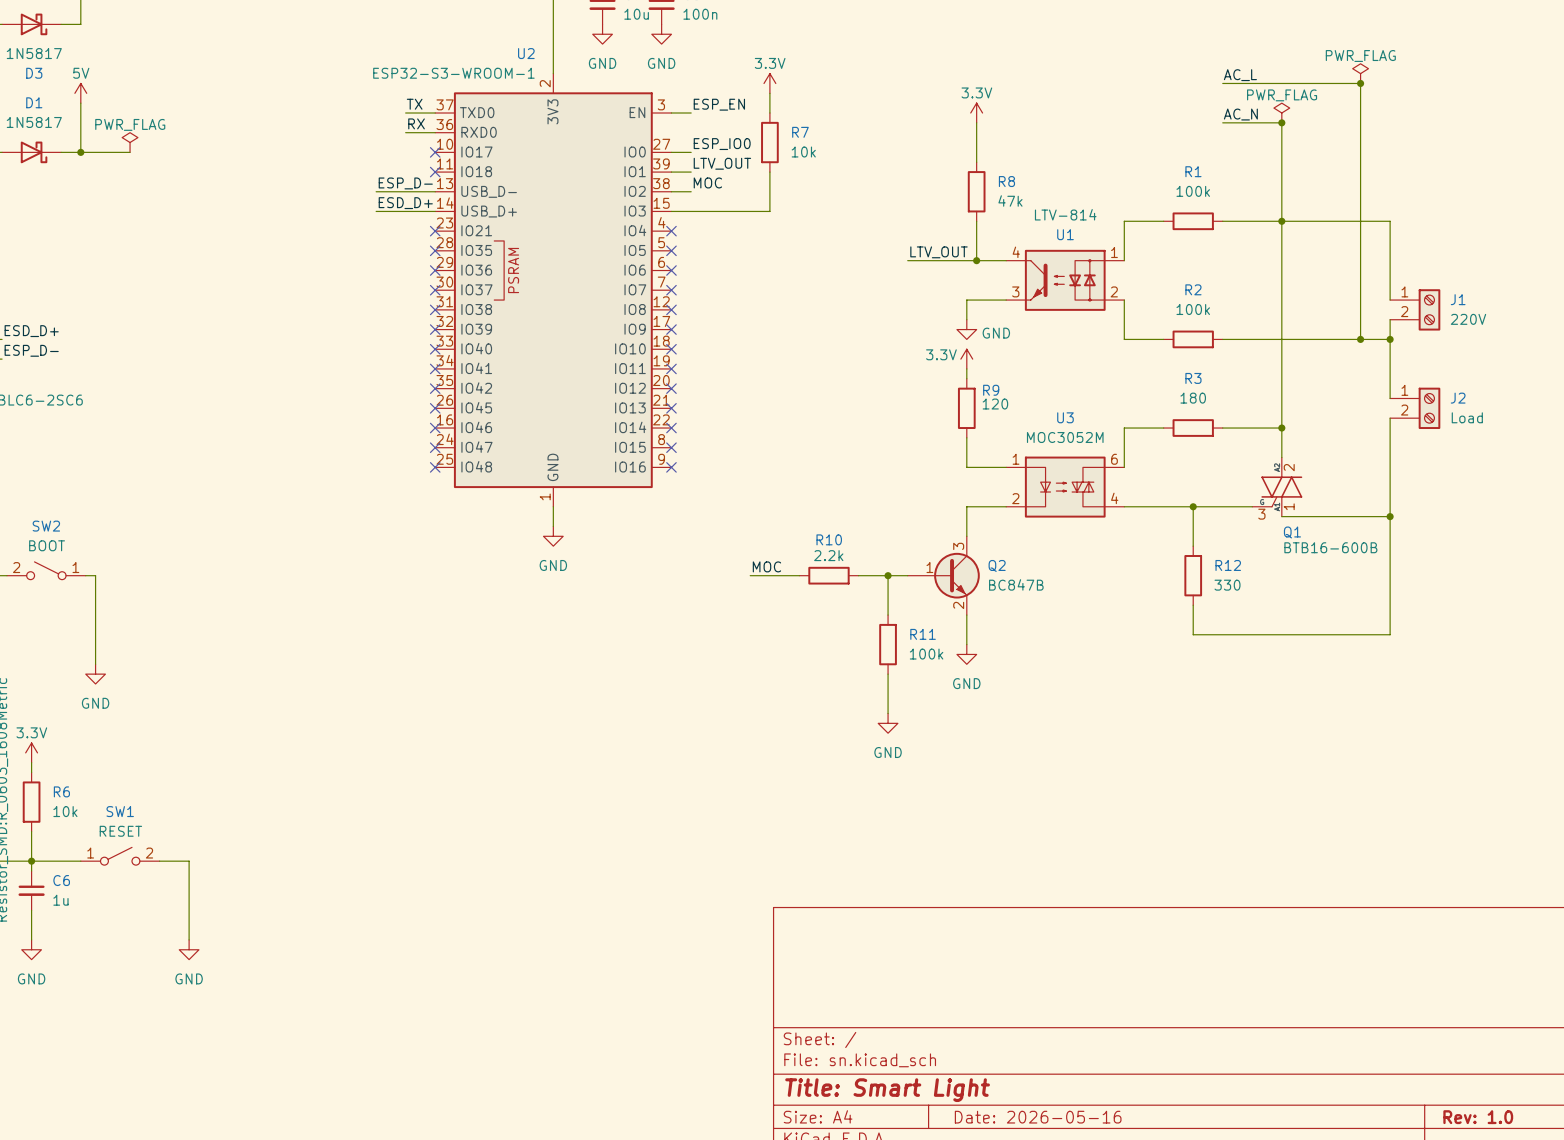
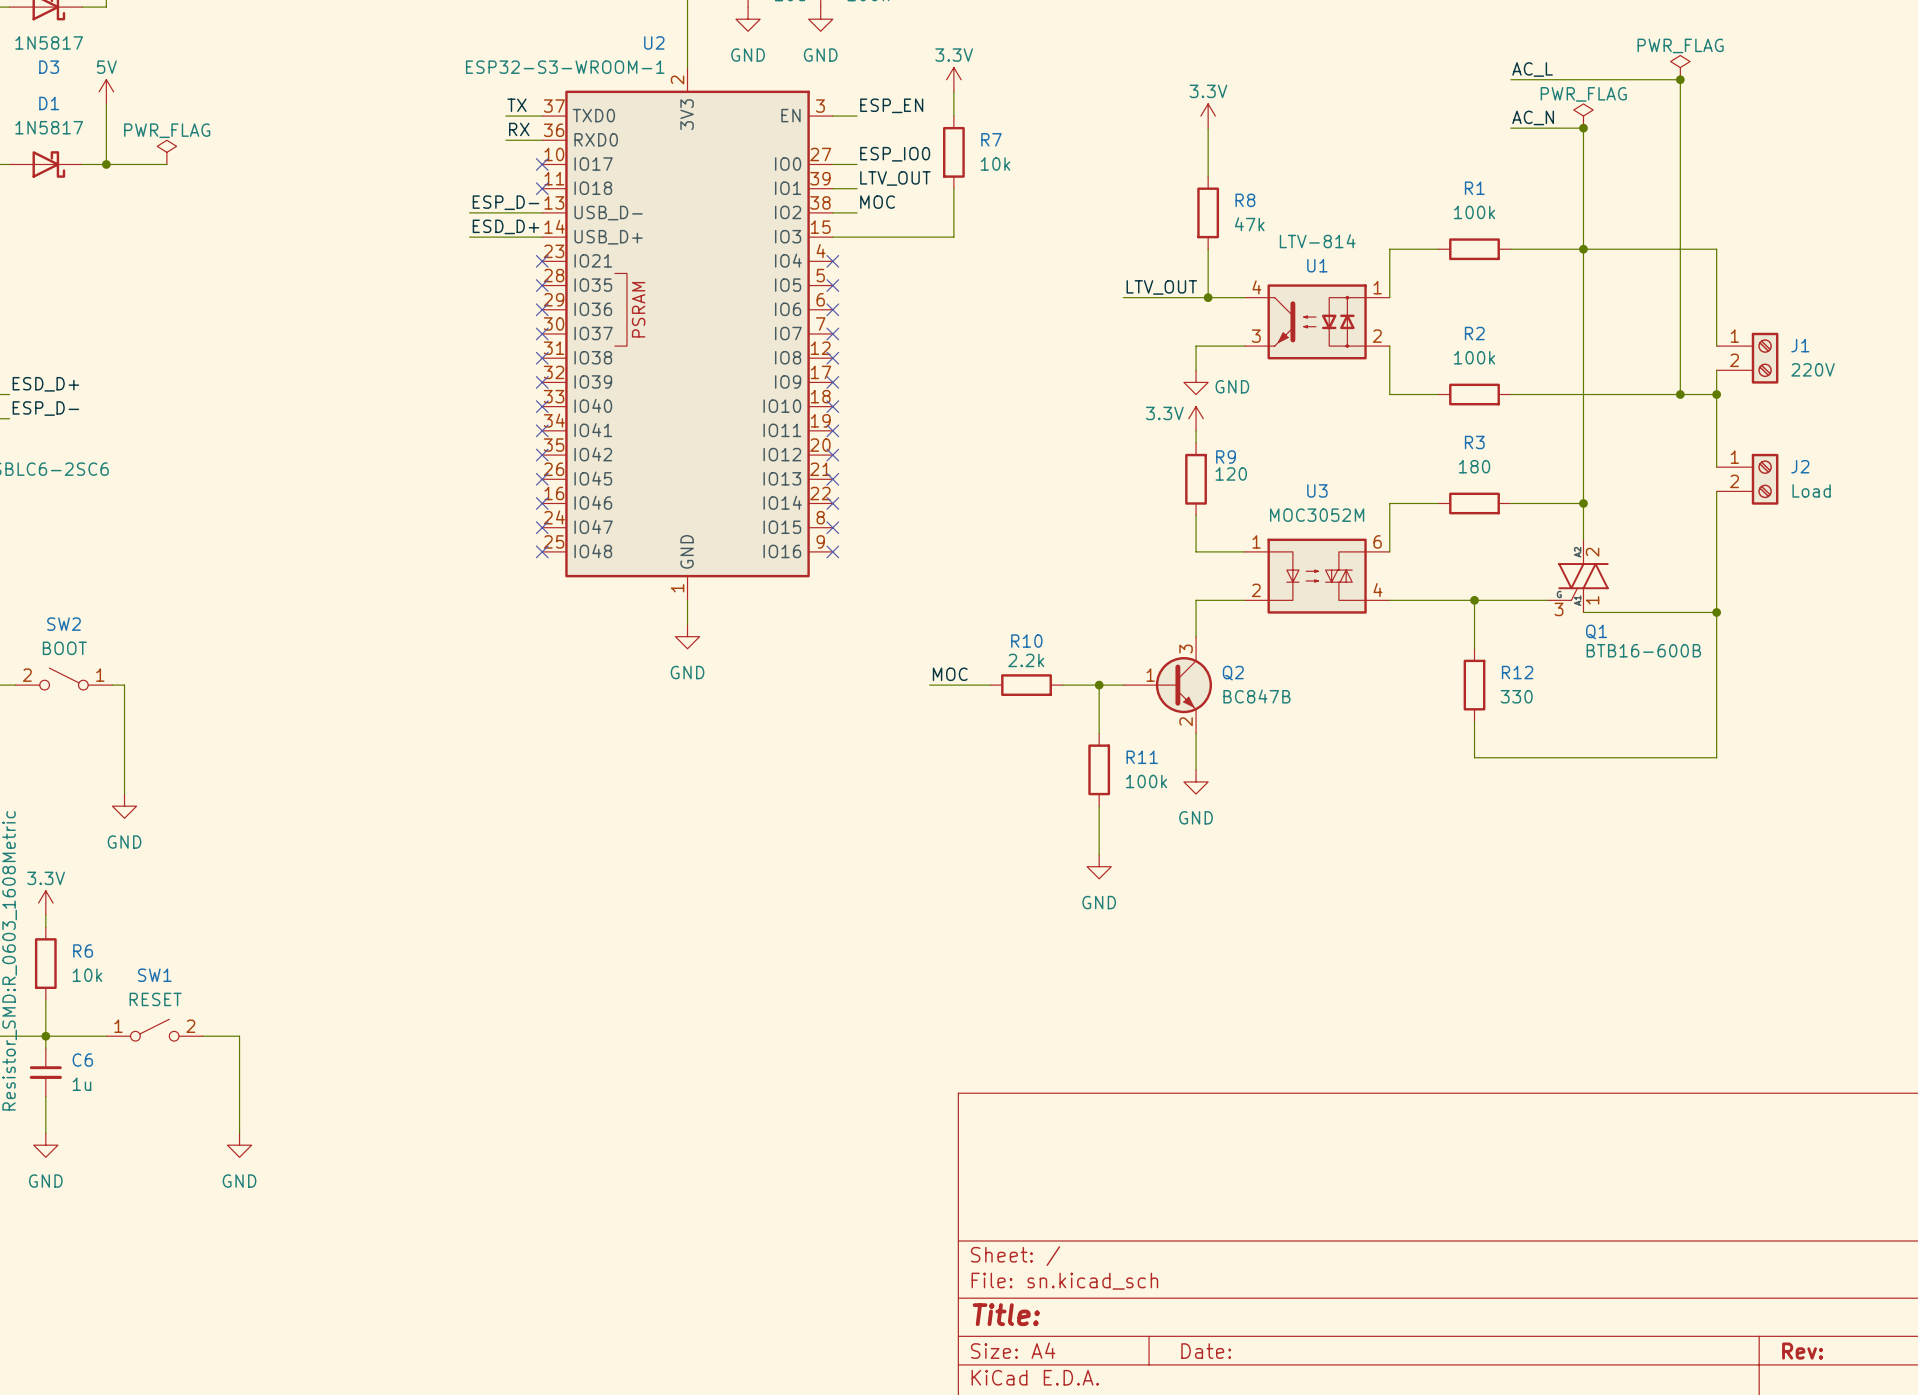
title block: Title: Smart Light (887, 1090) -> Title: (1006, 1314)
title block: Date: 2026-05-16 (1038, 1117) -> Date: (1206, 1351)
title block: Rev: 1.0 (1478, 1117) -> Rev: (1802, 1351)

